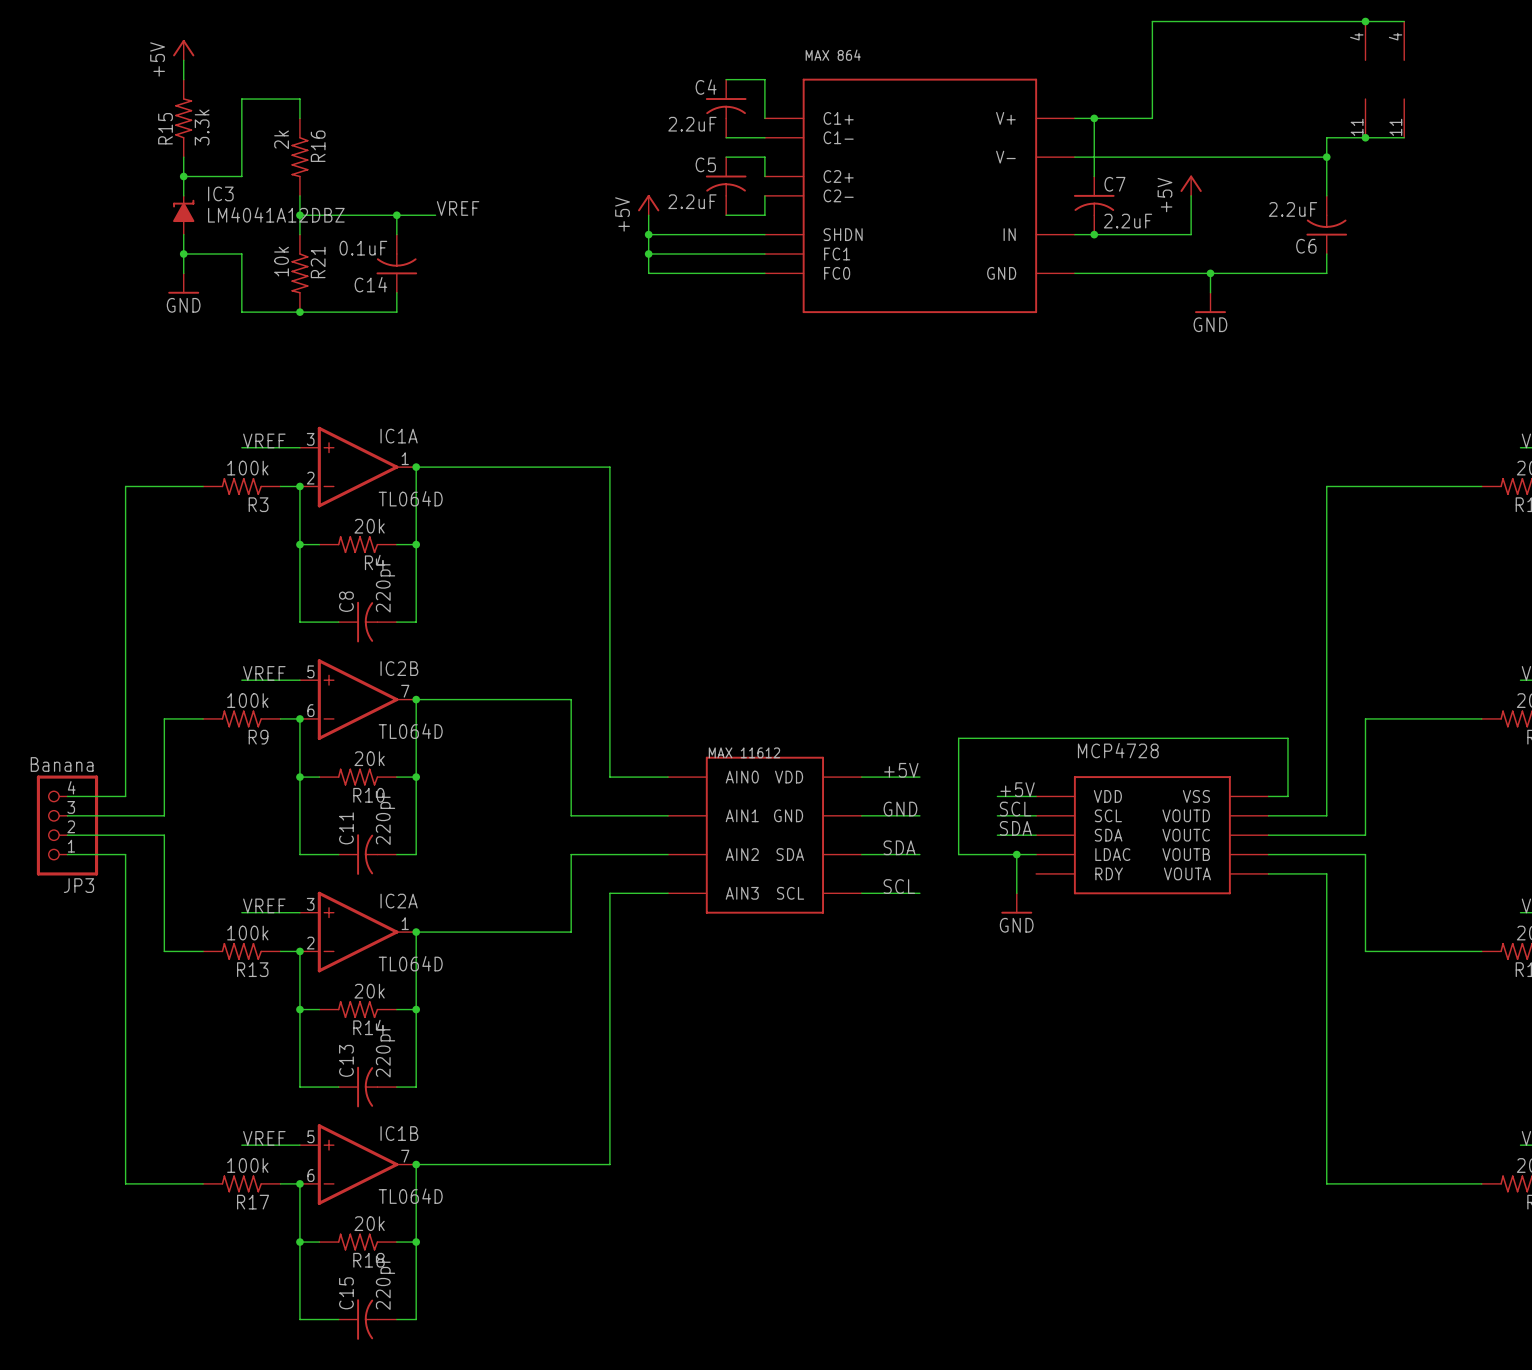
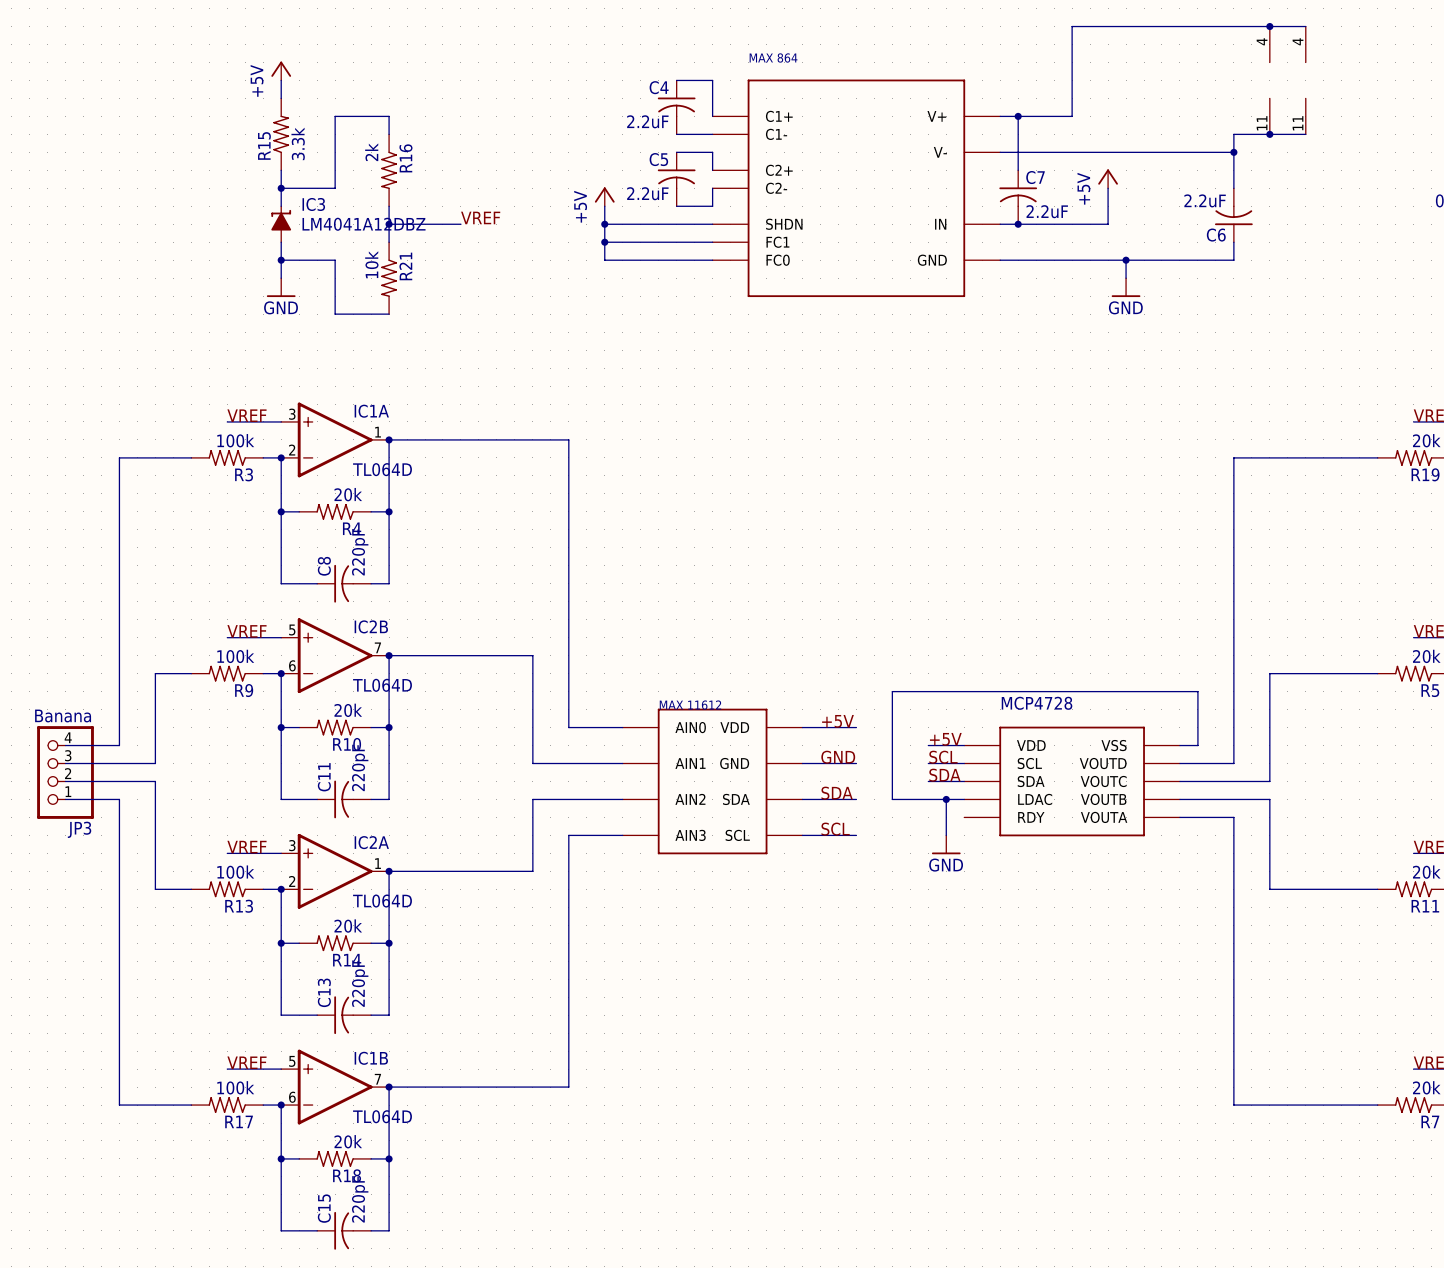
power symbol position: +5V (183, 50) -> +5V (281, 71)
wire: (183, 60) (183, 79) -> (281, 80) (281, 98)
R15 position: (183, 118) -> (281, 134)
wire: (299, 118) (299, 99) (241, 99) (241, 176) (183, 176) -> none
wire: none -> (389, 134) (389, 116) (335, 116) (335, 188) (281, 188) (281, 170)
wire: (183, 157) (183, 195) -> none
R16 position: (299, 157) -> (389, 170)
junction: (183, 176) -> none
label position: VREF (458, 208) -> VREF (480, 217)
IC3 position: (183, 215) -> (281, 224)
junction position: (299, 215) -> (281, 188)
wire: (396, 215) (396, 234) -> none
junction position: (396, 215) -> (389, 224)
wire: none -> (389, 206) (389, 242)
wire: (435, 215) (299, 215) (299, 234) -> none
wire: (183, 234) (183, 273) -> (281, 242) (281, 278)
wire: none -> (389, 224) (460, 224)
wire: (183, 254) (241, 254) (241, 312) (396, 312) (396, 292) -> none
junction: (183, 254) -> none
C14: 0.1uF (396, 263) -> none
wire: none -> (281, 260) (335, 260) (335, 314) (389, 314)
R21 position: (299, 273) -> (389, 278)
junction: none -> (281, 260)
power symbol position: GND (183, 283) -> GND (281, 287)
junction: (299, 312) -> none

